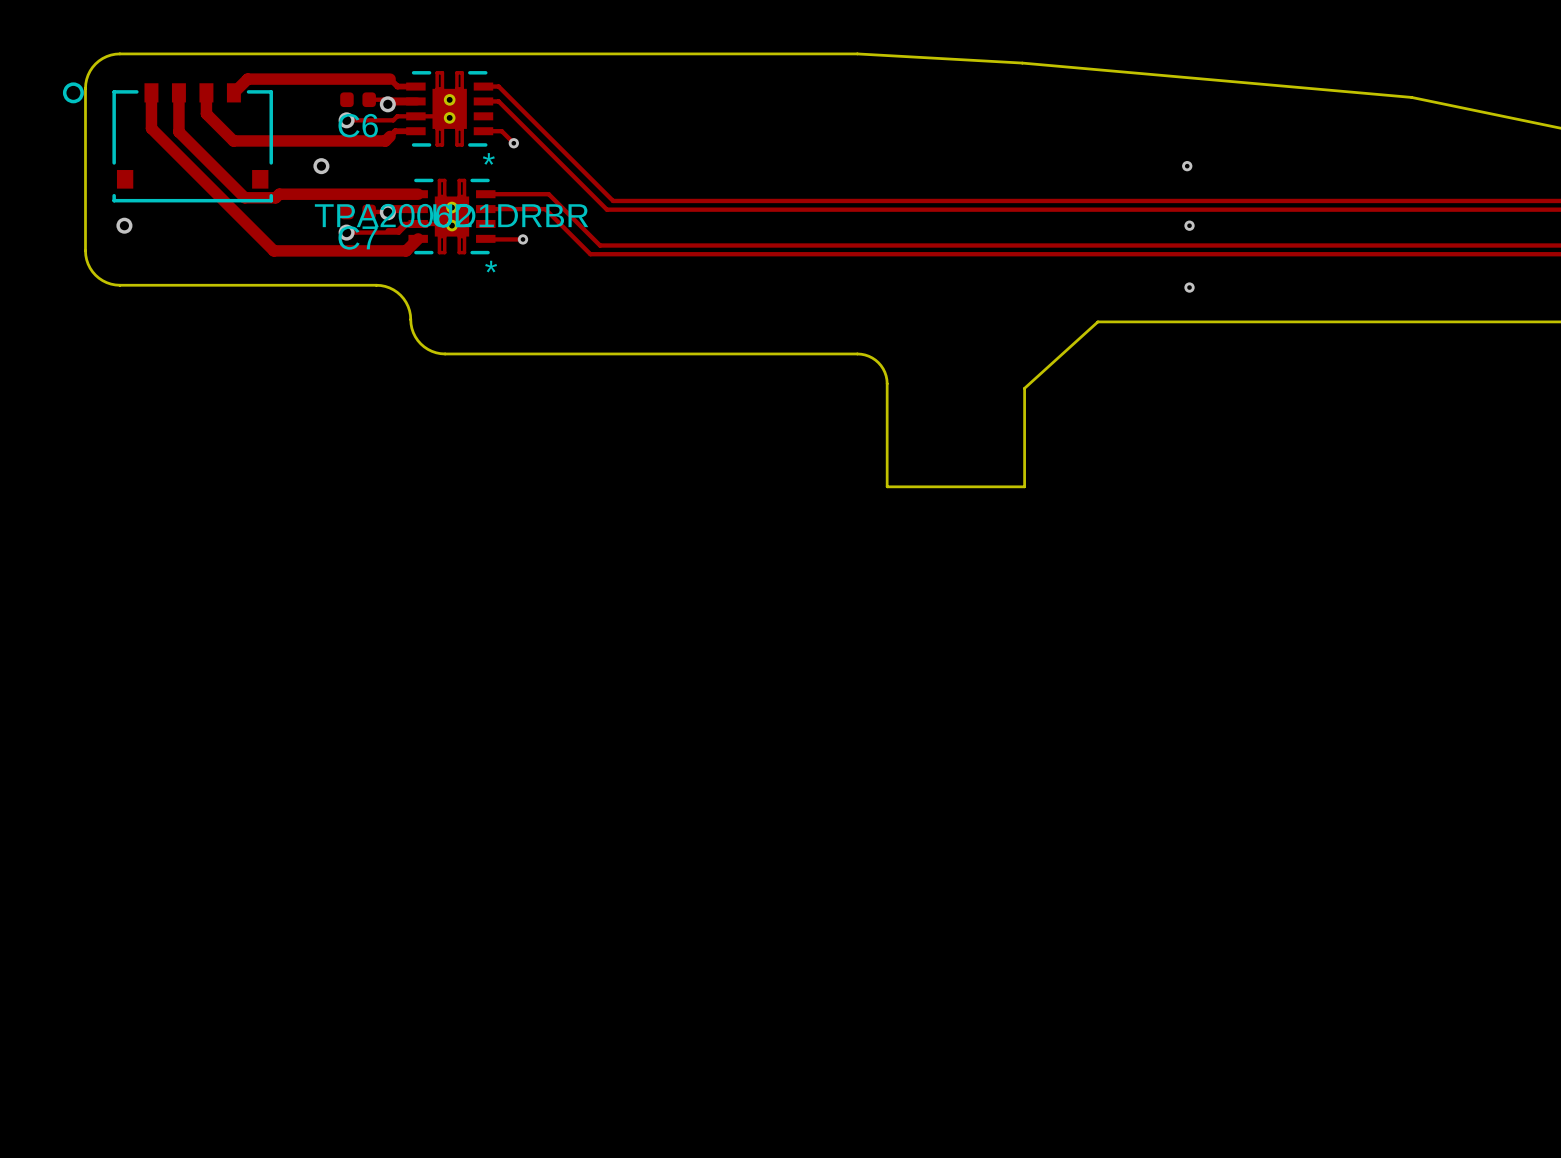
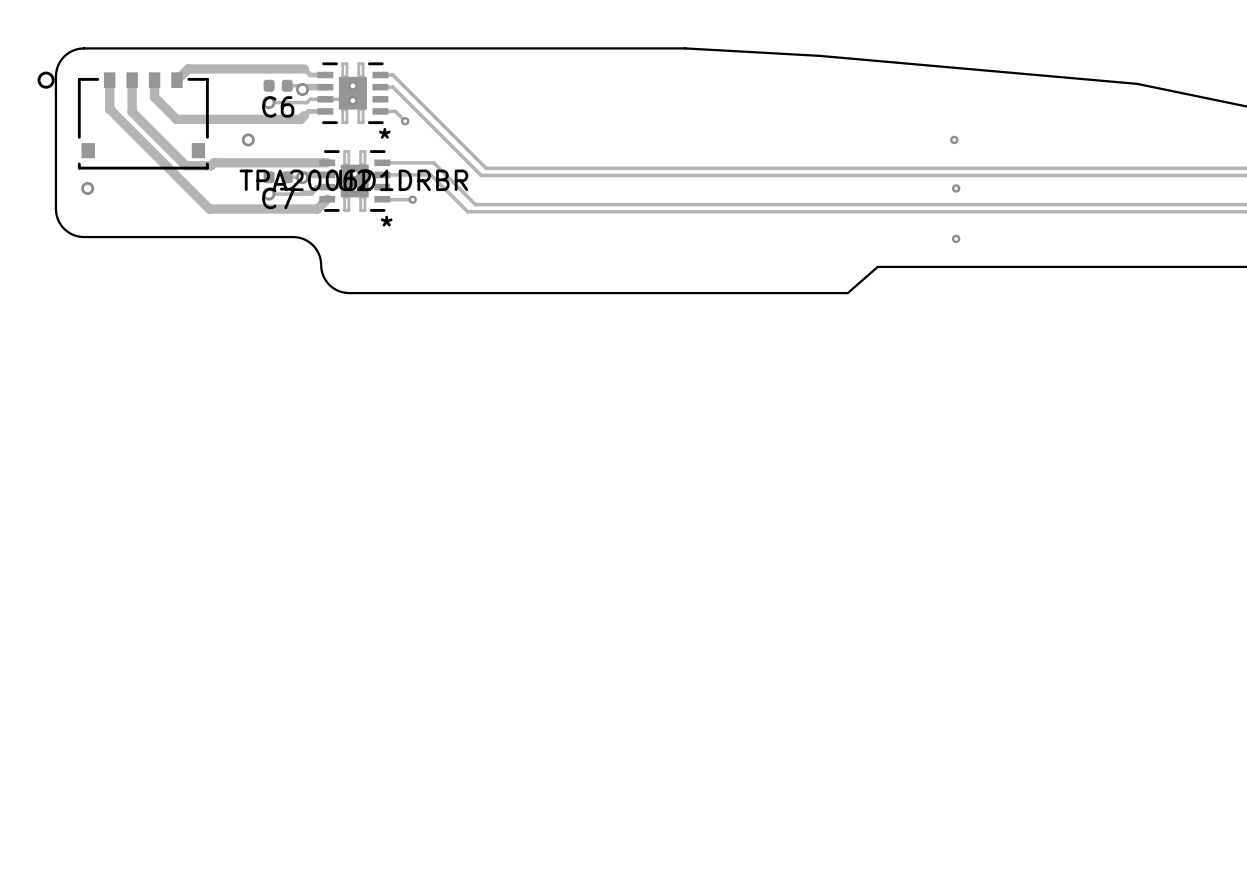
board edge: (1097, 321) (1024, 388) (1024, 486) (887, 486) (886, 376) (881, 365) (875, 360) (865, 354) (857, 353) -> (881, 266) (877, 266) (847, 293) (685, 293)

